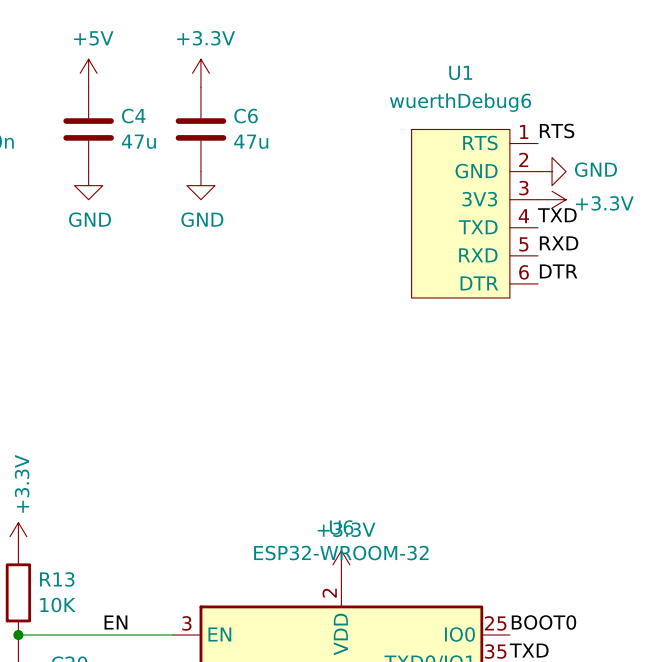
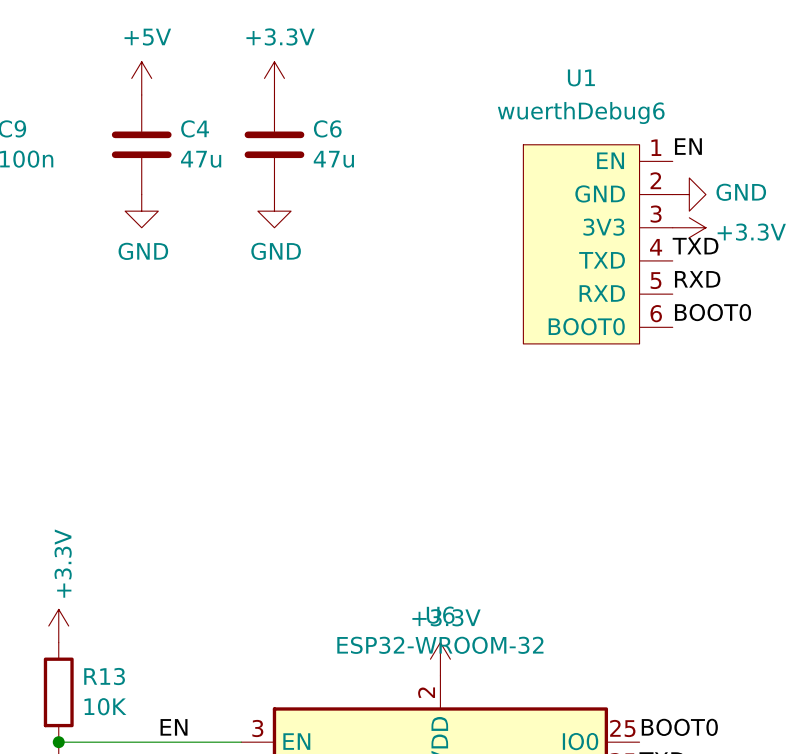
label: RTS (557, 131) -> EN (688, 146)
U1 pin name: RTS (480, 143) -> EN (610, 160)
label: DTR (558, 271) -> BOOT0 (713, 312)
U1 pin name: DTR (479, 283) -> BOOT0 (586, 326)

